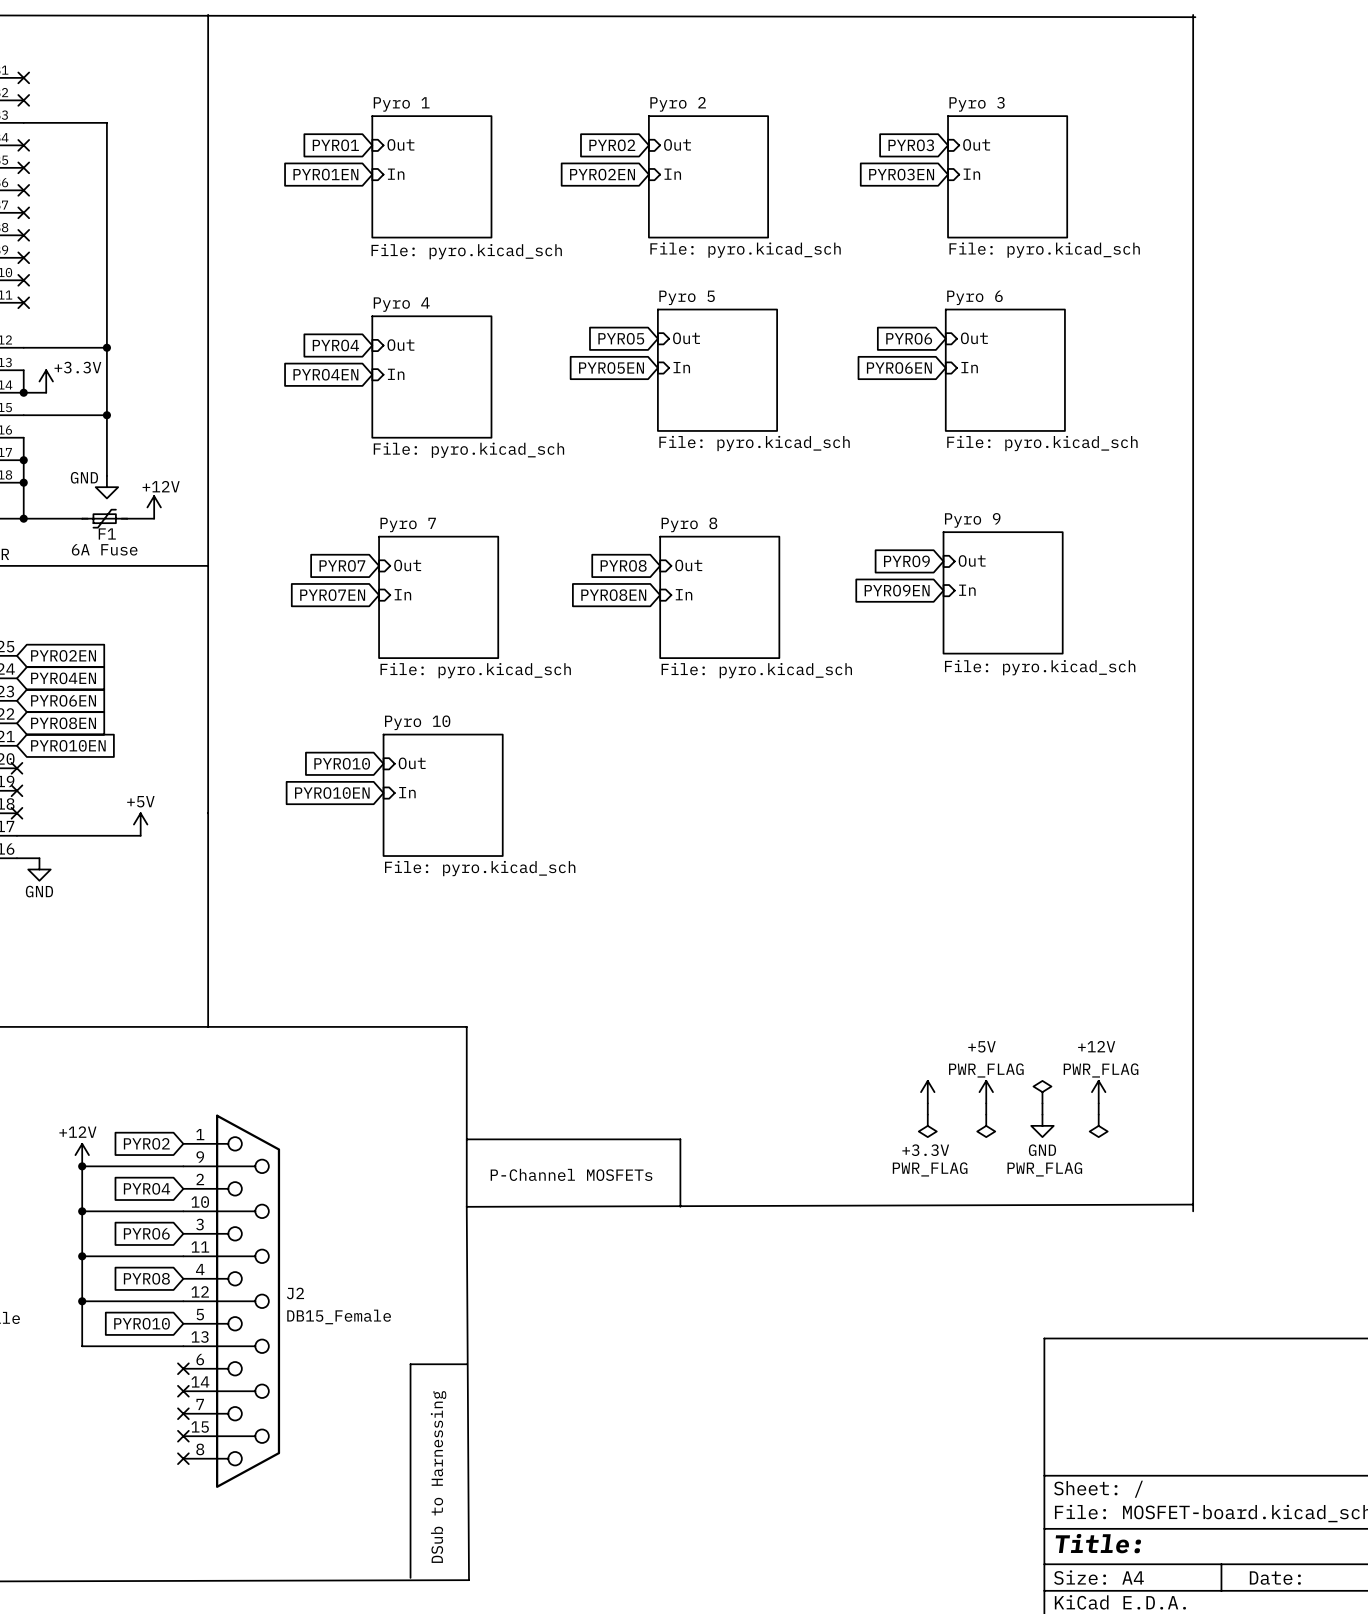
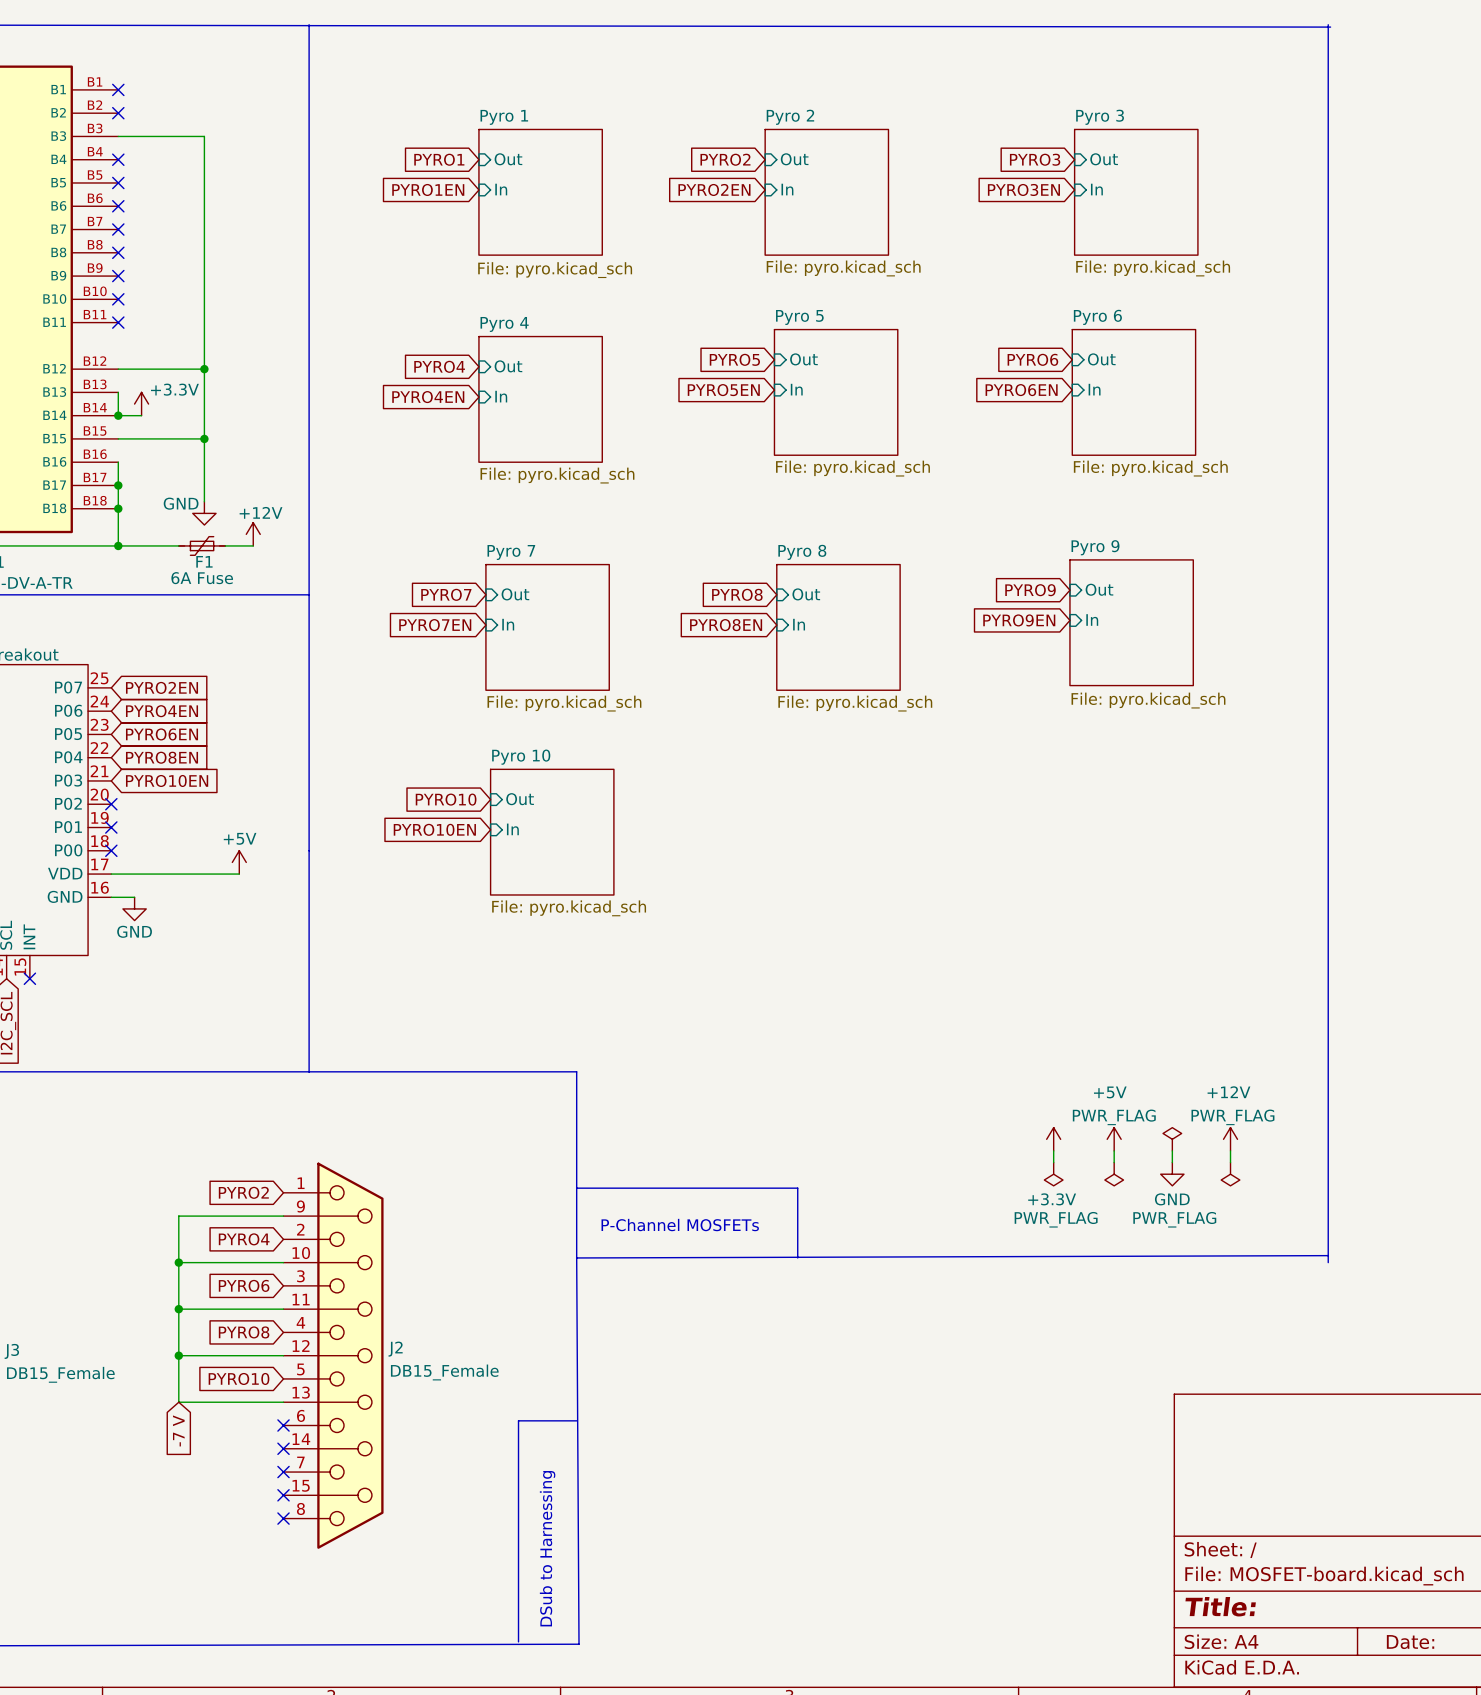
power symbol: +12V (82, 1155) -> none
junction: (82, 1166) -> none
global label: none -> -7 V (178, 1430)

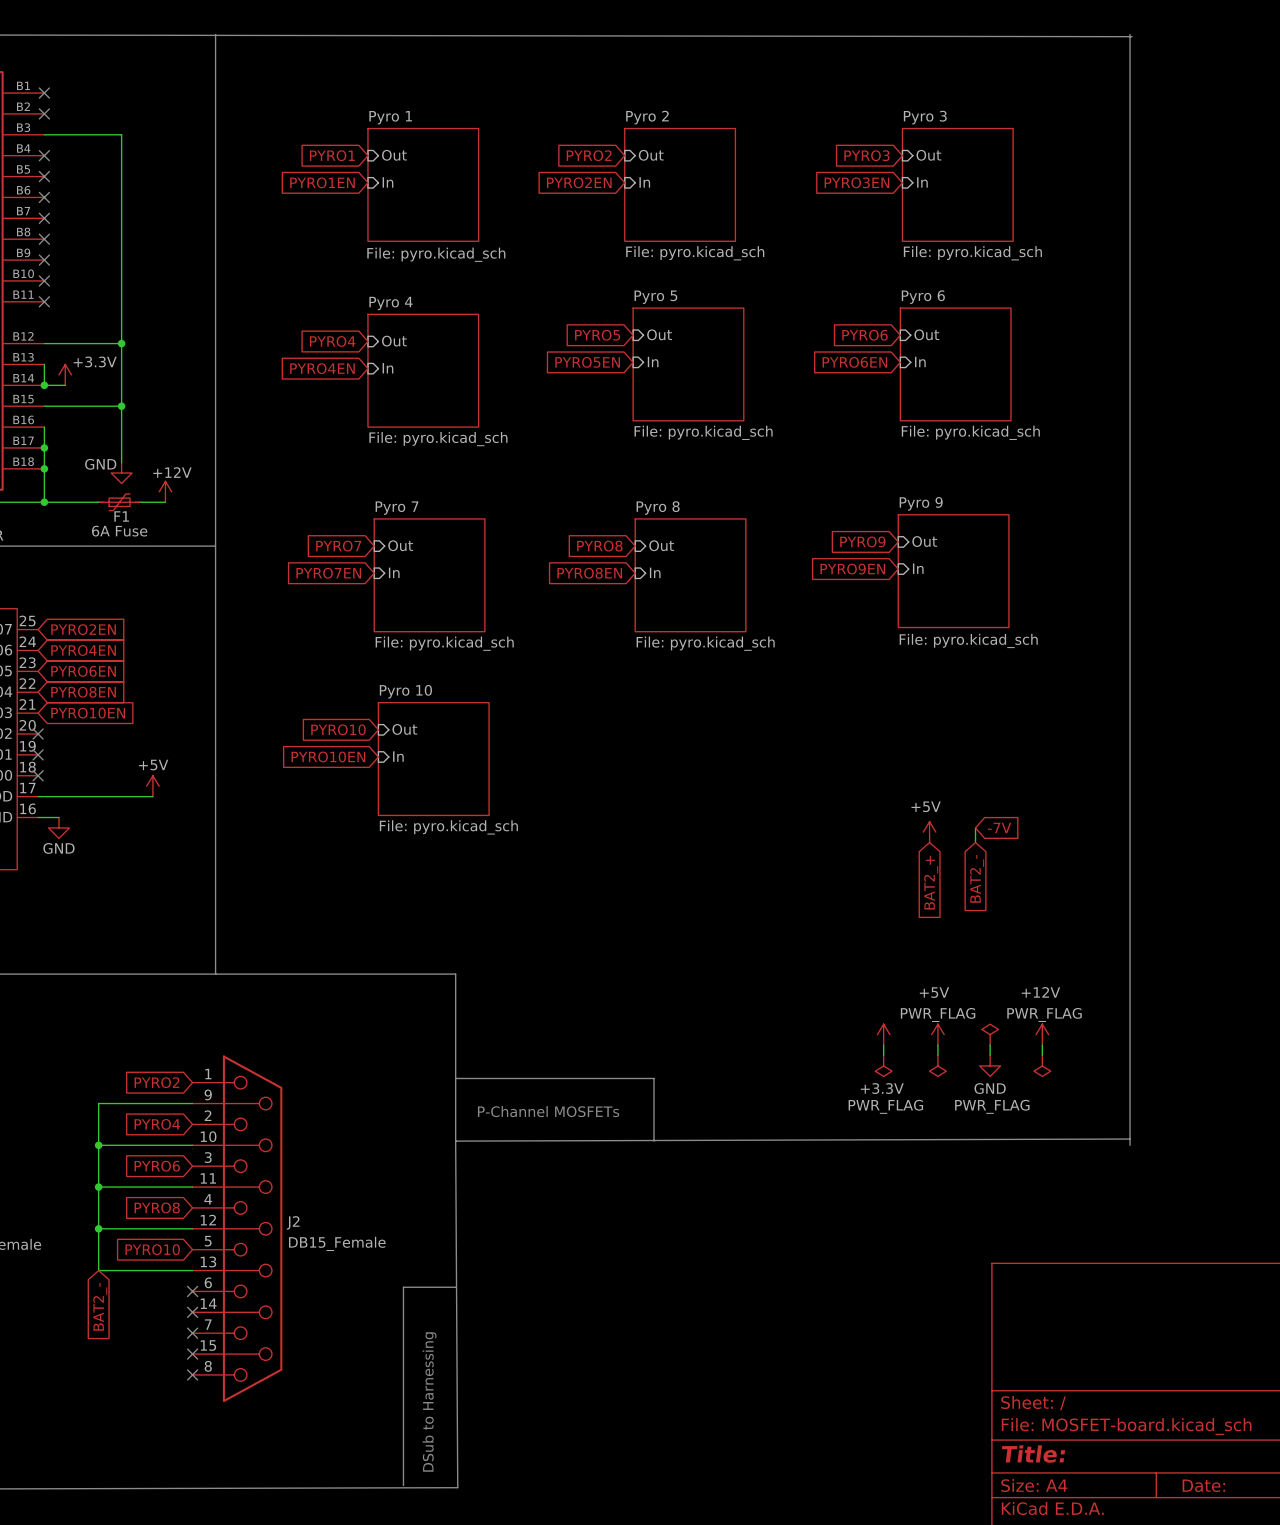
wire: none -> (975, 827) (975, 842)
global label: none -> -7V (999, 827)
power symbol: none -> +5V (929, 832)
global label: none -> BAT2_- (977, 878)
global label: none -> BAT2_+ (931, 882)
global label: -7 V (178, 1430) -> BAT2_- (100, 1306)

